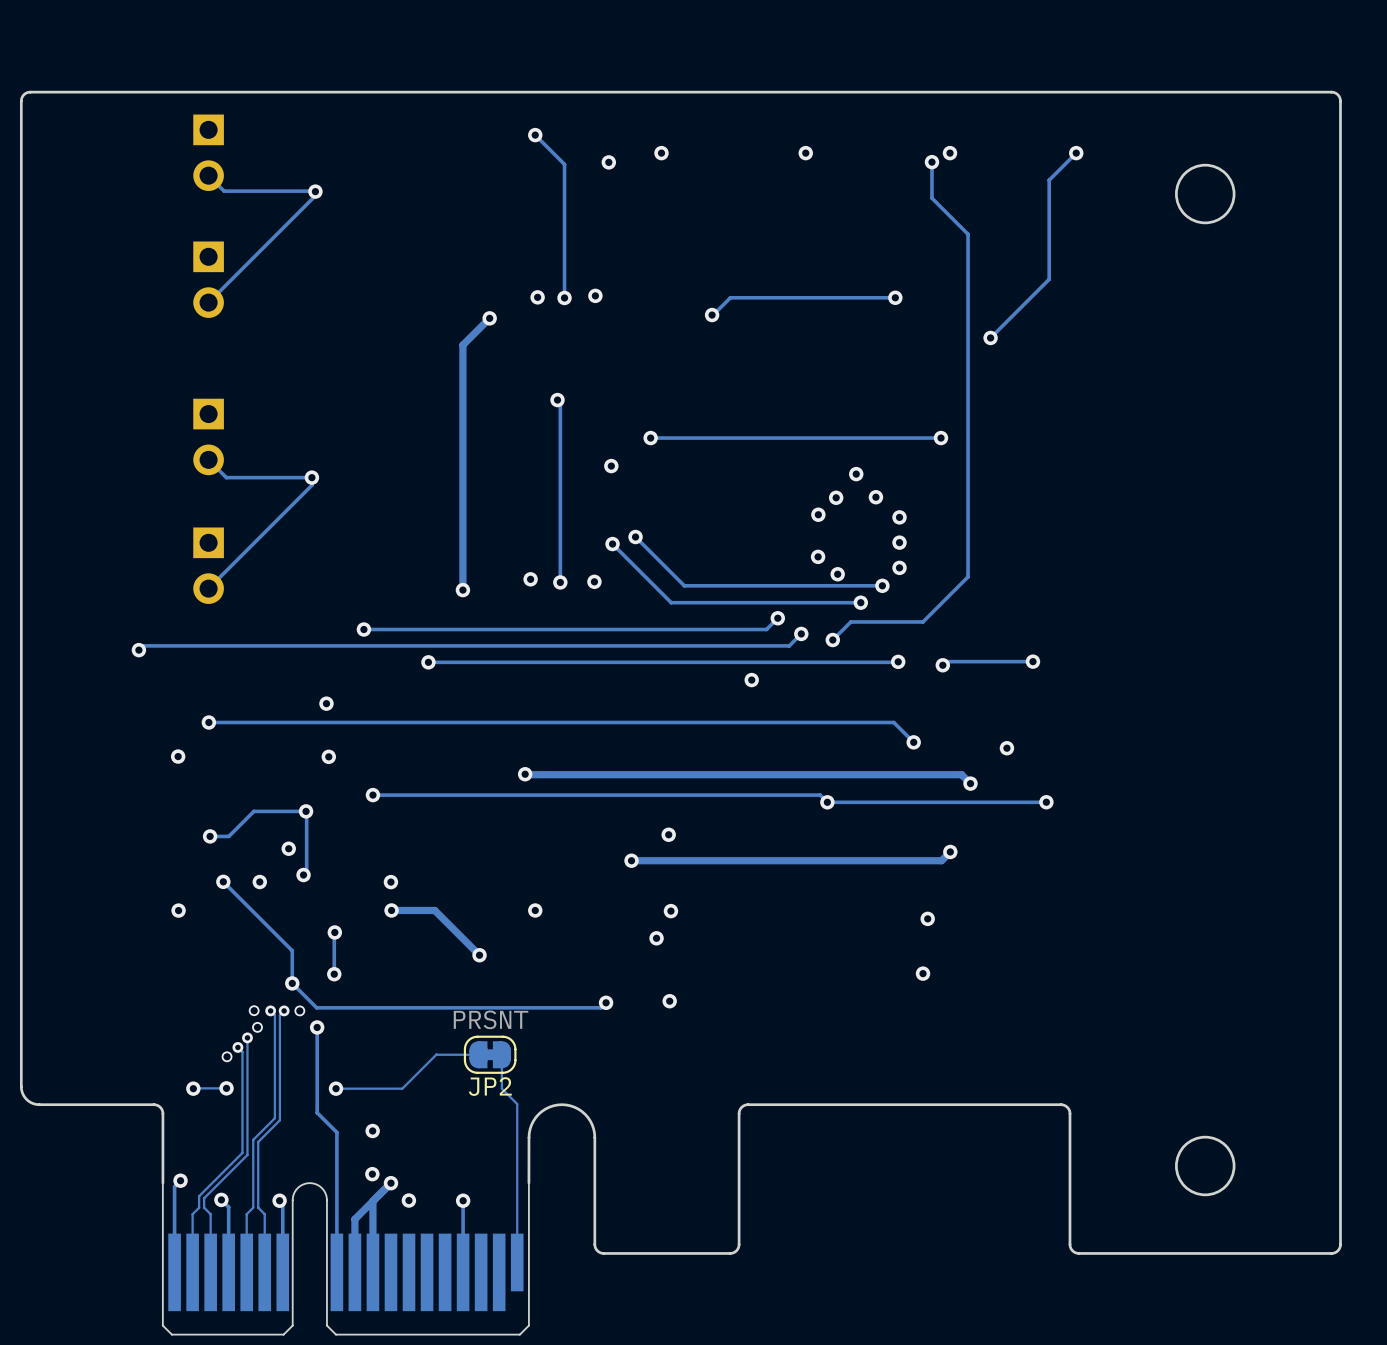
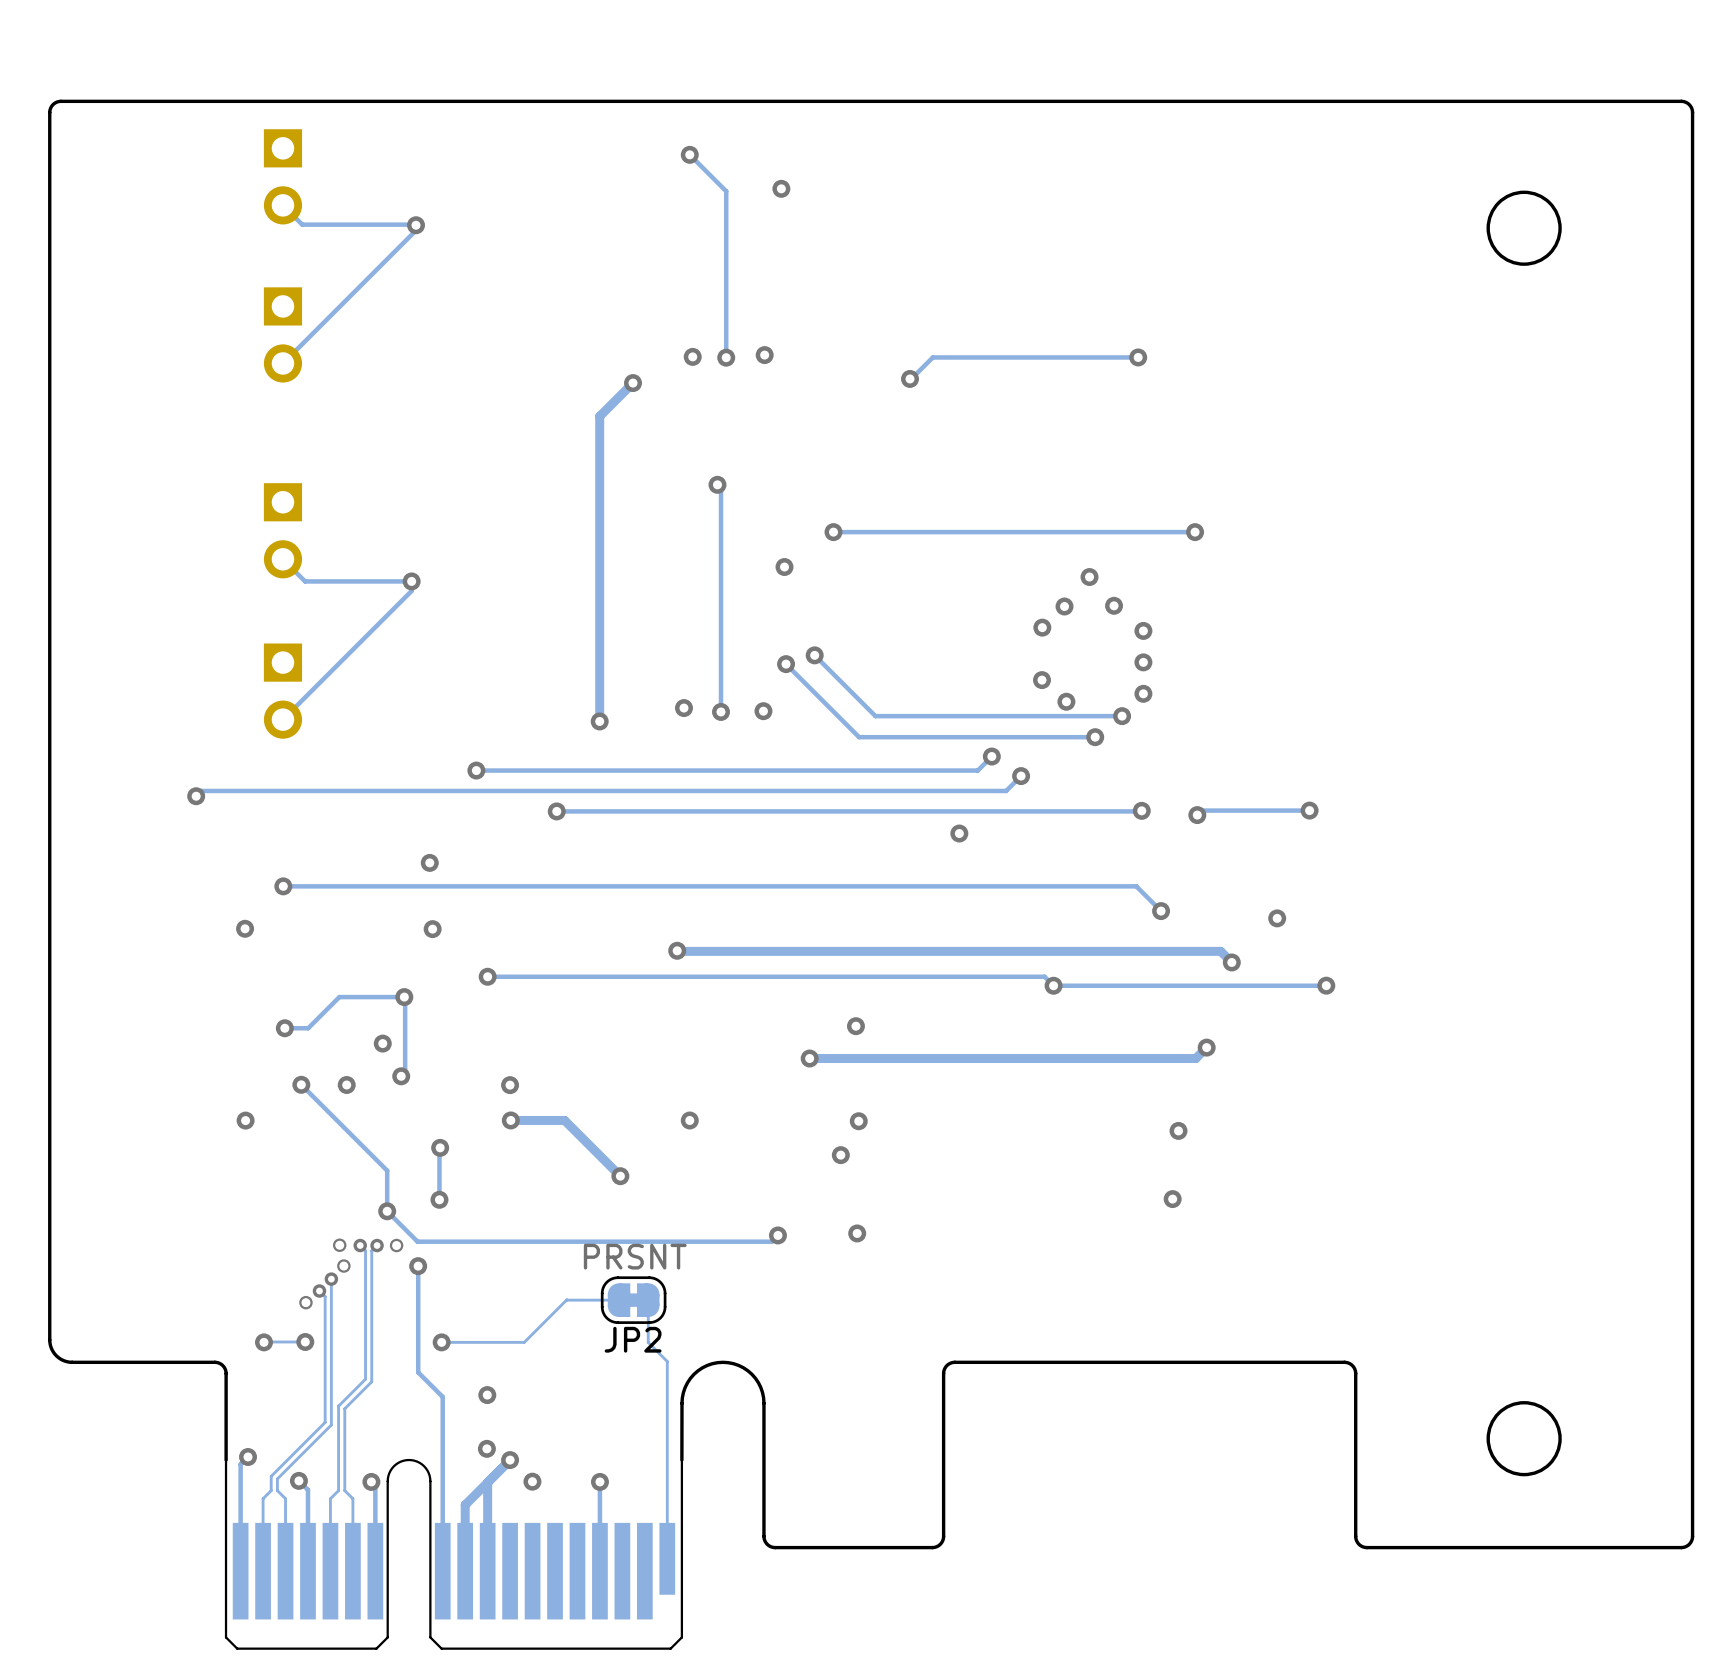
via: (661, 153) -> none
via: (805, 153) -> none
via: (950, 153) -> none
track: (1076, 153) (1049, 180) (1049, 279) (990, 337) -> none
via: (1076, 153) -> none
track: (931, 162) (931, 198) (968, 234) (968, 576) (922, 621) (850, 621) (832, 640) -> none
via: (931, 162) -> none
via: (990, 337) -> none
via: (832, 640) -> none

